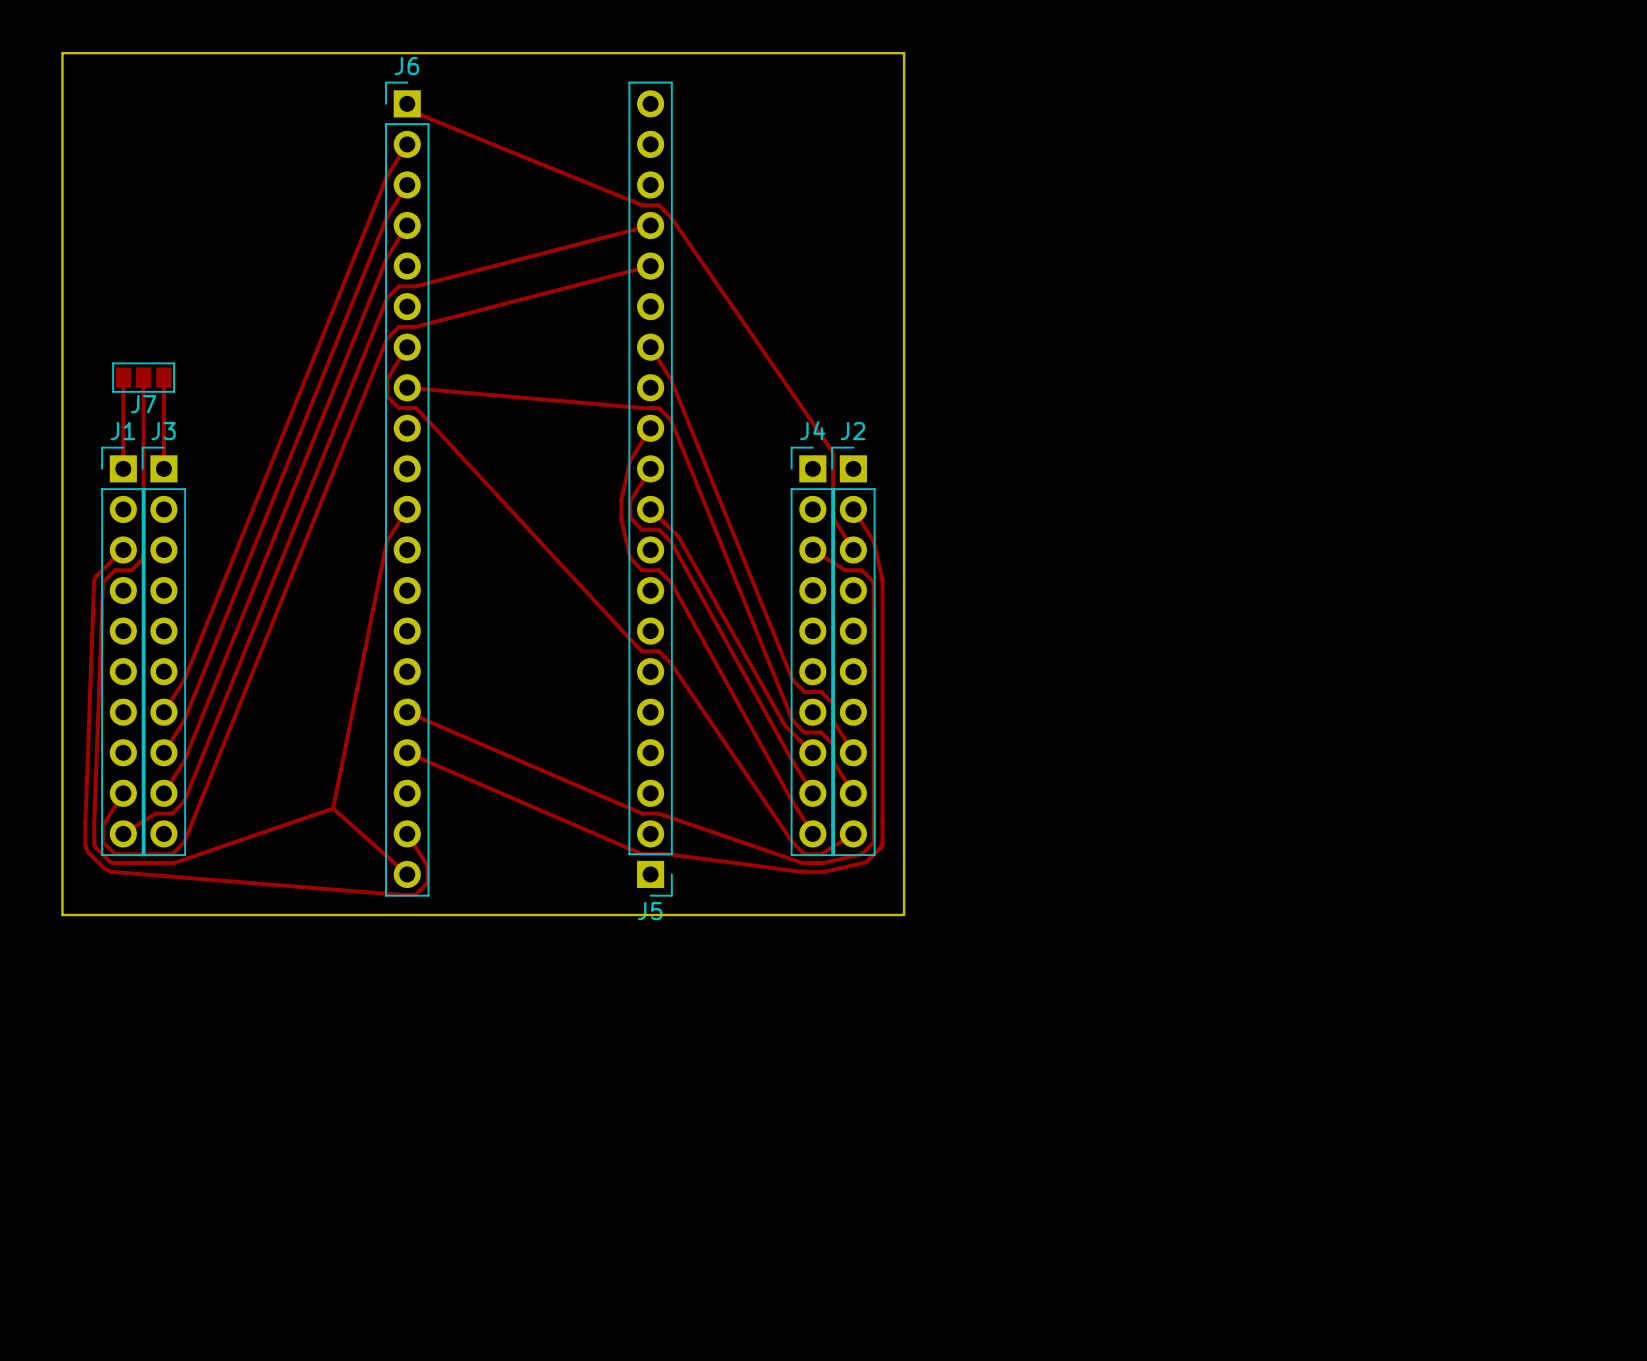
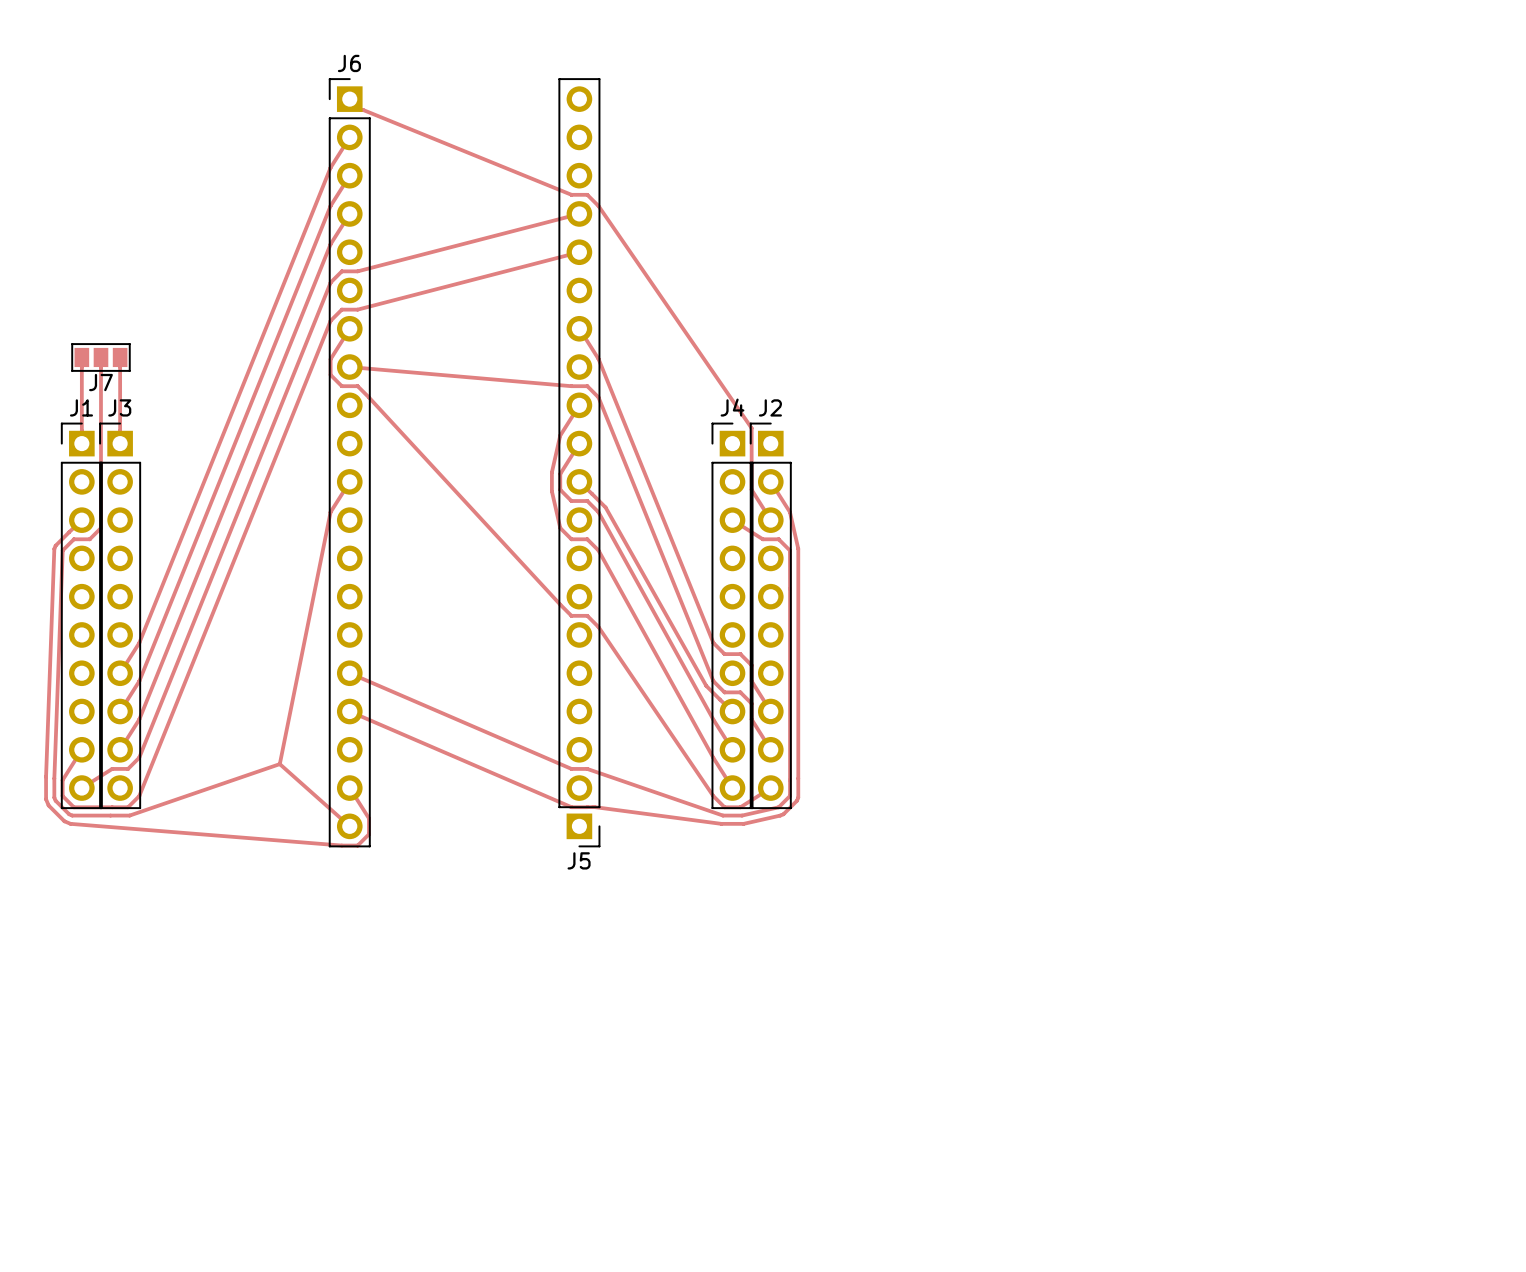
board edge: (62, 53) (904, 53) (904, 915) (62, 915) (62, 53) -> none

